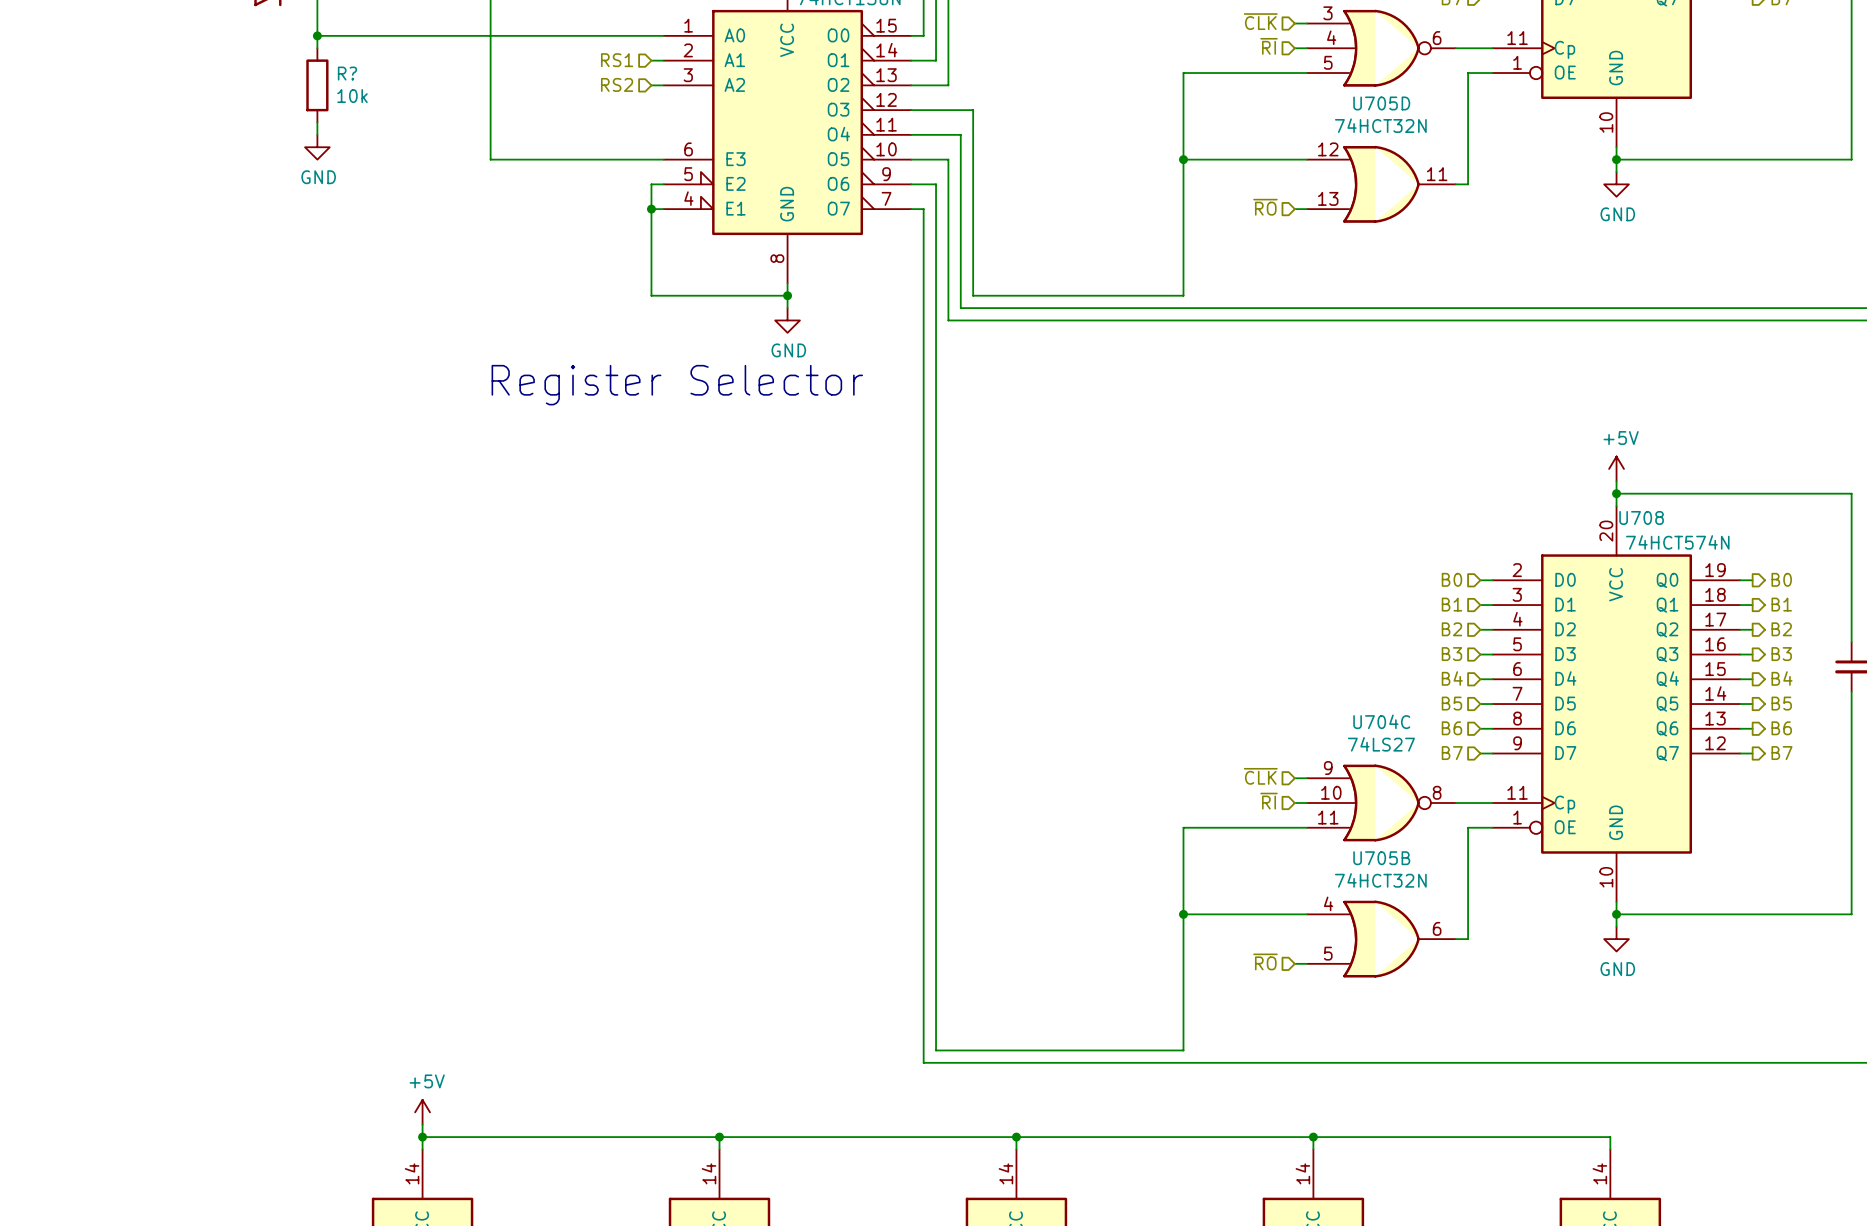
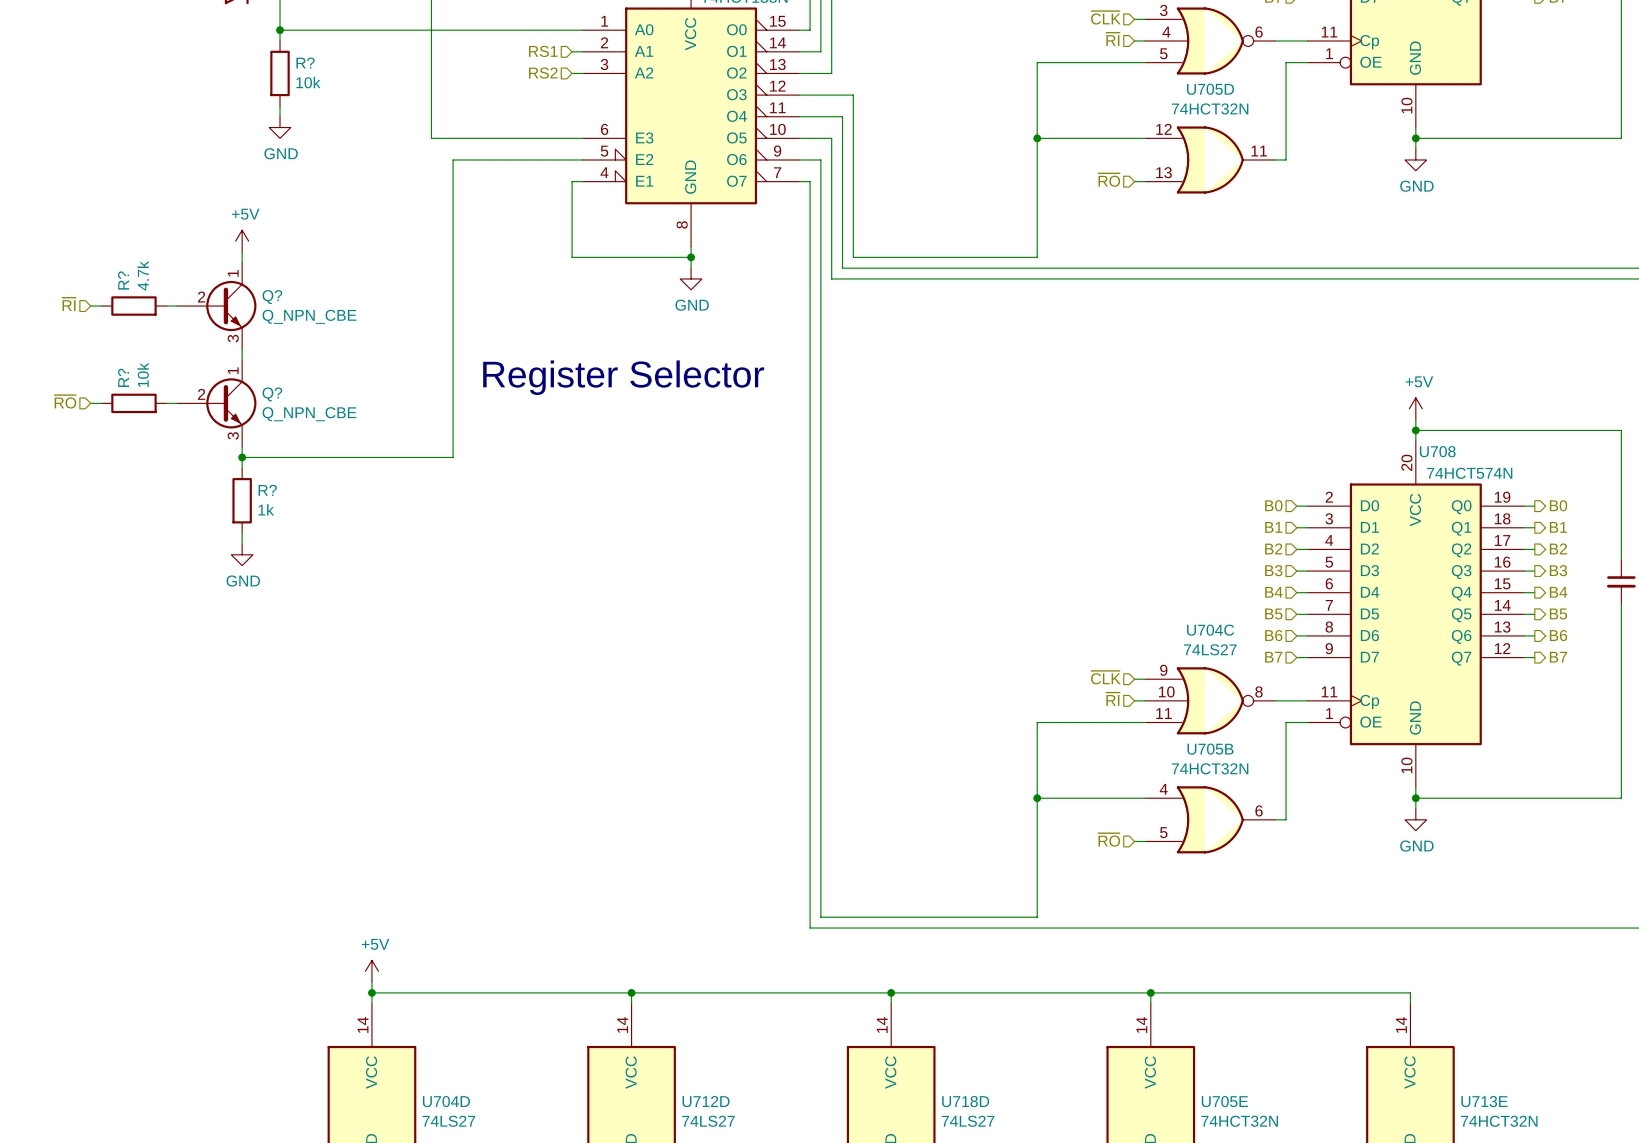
wire: (651, 184) (651, 209) -> (572, 159) (453, 159) (453, 457) (242, 457)
junction: (651, 209) -> none
power symbol: none -> +5V (242, 241)
wire: none -> (242, 251) (242, 262)
hierarchical label: none -> ~{RI} (69, 304)
wire: none -> (90, 306) (101, 306)
R?: none -> 4.7k (133, 306)
wire: none -> (166, 306) (177, 306)
Q?: none -> Q_NPN_CBE (216, 306)
text position: Register Selector (677, 385) -> Register Selector (623, 377)
wire: none -> (242, 349) (242, 360)
hierarchical label: none -> ~{RO} (65, 401)
wire: none -> (90, 403) (101, 403)
R?: none -> 10k (133, 403)
wire: none -> (166, 403) (177, 403)
Q?: none -> Q_NPN_CBE (216, 403)
wire: none -> (242, 446) (242, 468)
junction: none -> (242, 457)
R?: none -> 1k (242, 500)
wire: none -> (242, 533) (242, 544)
power symbol: none -> GND (242, 554)

